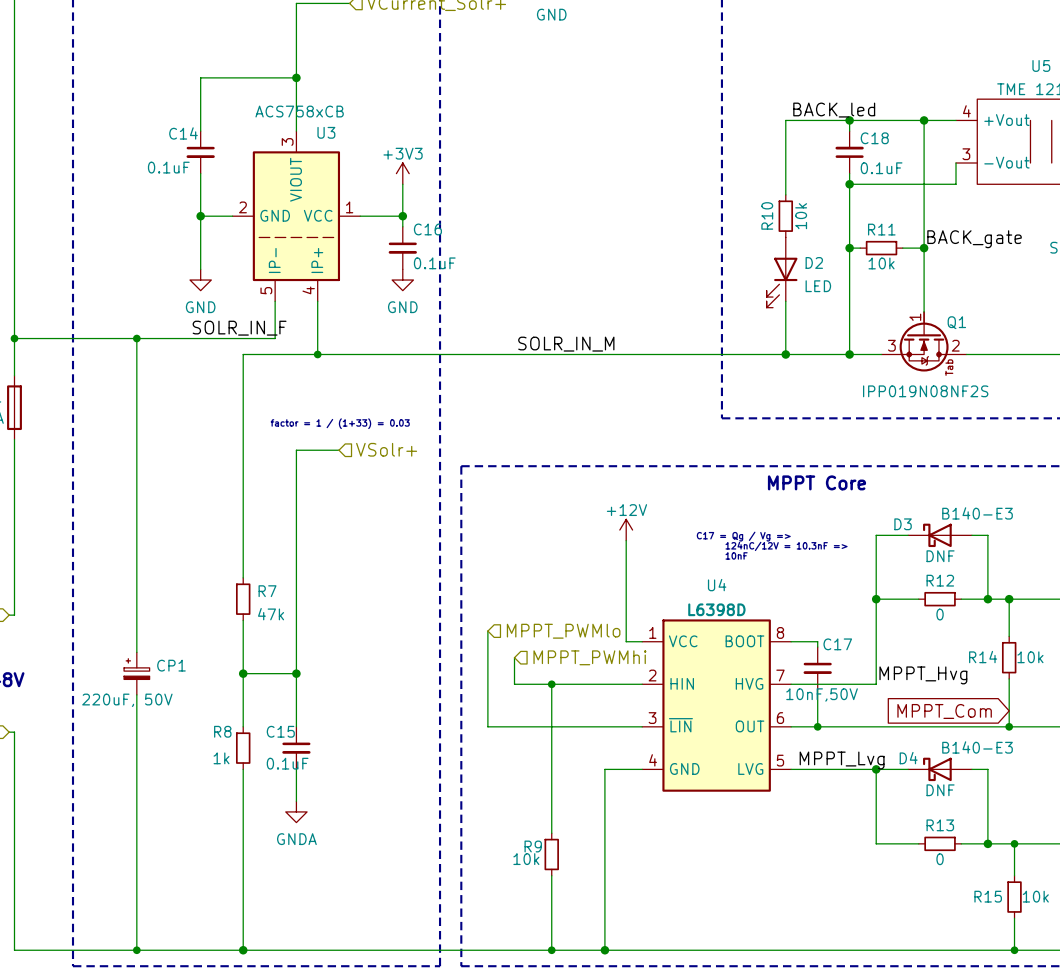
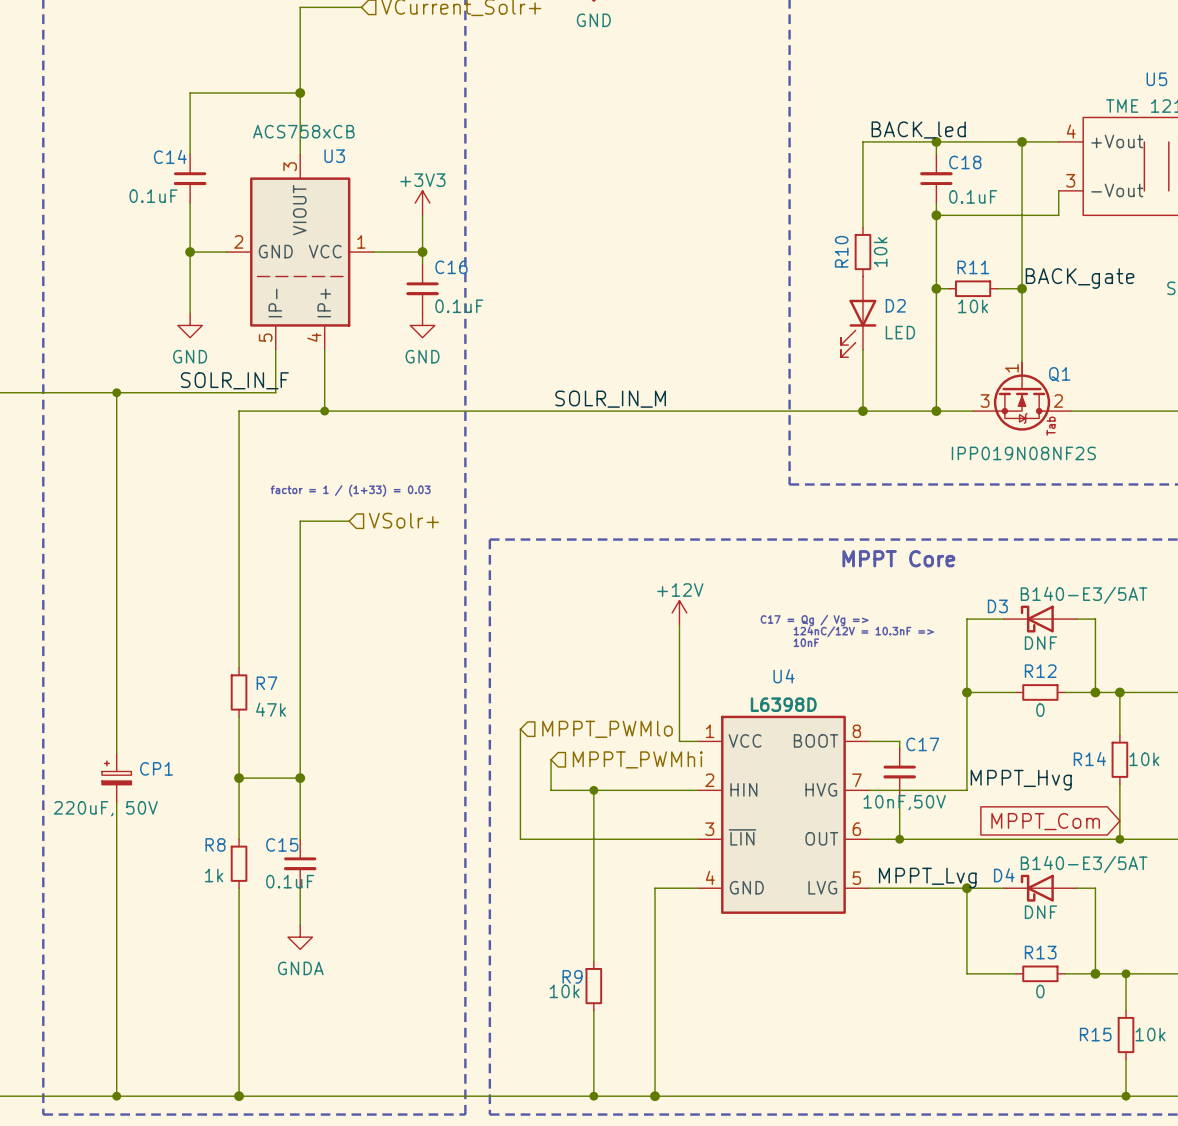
D3 value: B140-E3 (977, 513) -> B140-E3/5AT (1084, 595)
D4 value: B140-E3 (977, 747) -> B140-E3/5AT (1084, 864)

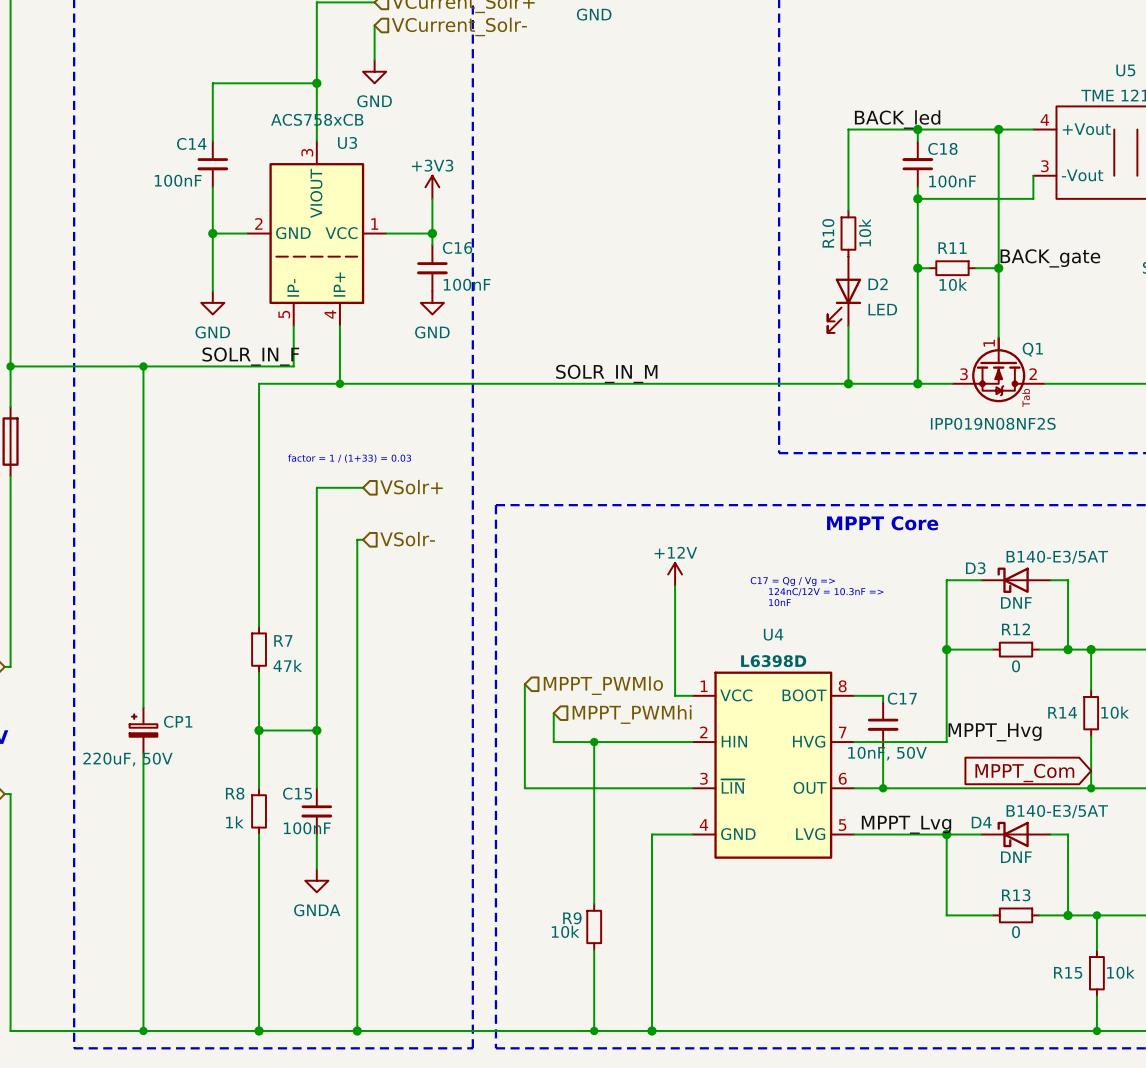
wire: none -> (374, 25) (374, 60)
hierarchical label: none -> VCurrent_Solr- (459, 26)
power symbol: none -> GND (374, 71)
C14 value: 0.1uF (153, 196) -> 100nF (178, 180)
C18 value: 0.1uF (973, 196) -> 100nF (952, 181)
C16 value: 0.1uF (459, 306) -> 100nF (467, 284)
hierarchical label: none -> VSolr- (407, 539)
wire: none -> (363, 539) (357, 539) (357, 1030)
C17 value: 10nF,50V (904, 802) -> 10nF, 50V (887, 753)
C15 value: 0.1uF (290, 881) -> 100nF (307, 828)
junction: none -> (357, 1030)

